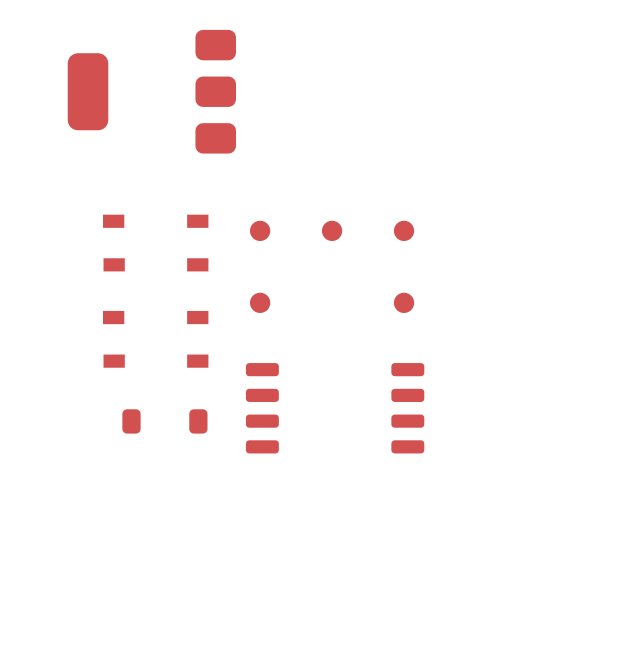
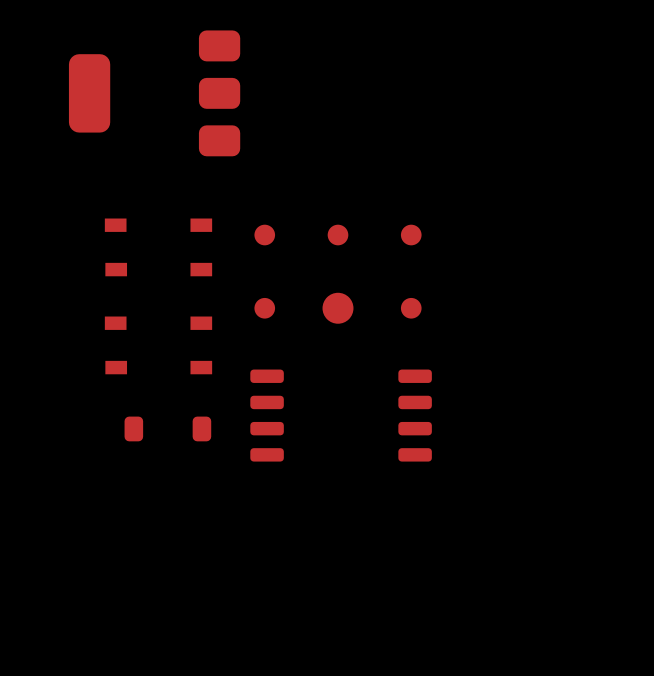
part: none -> (338, 308)

